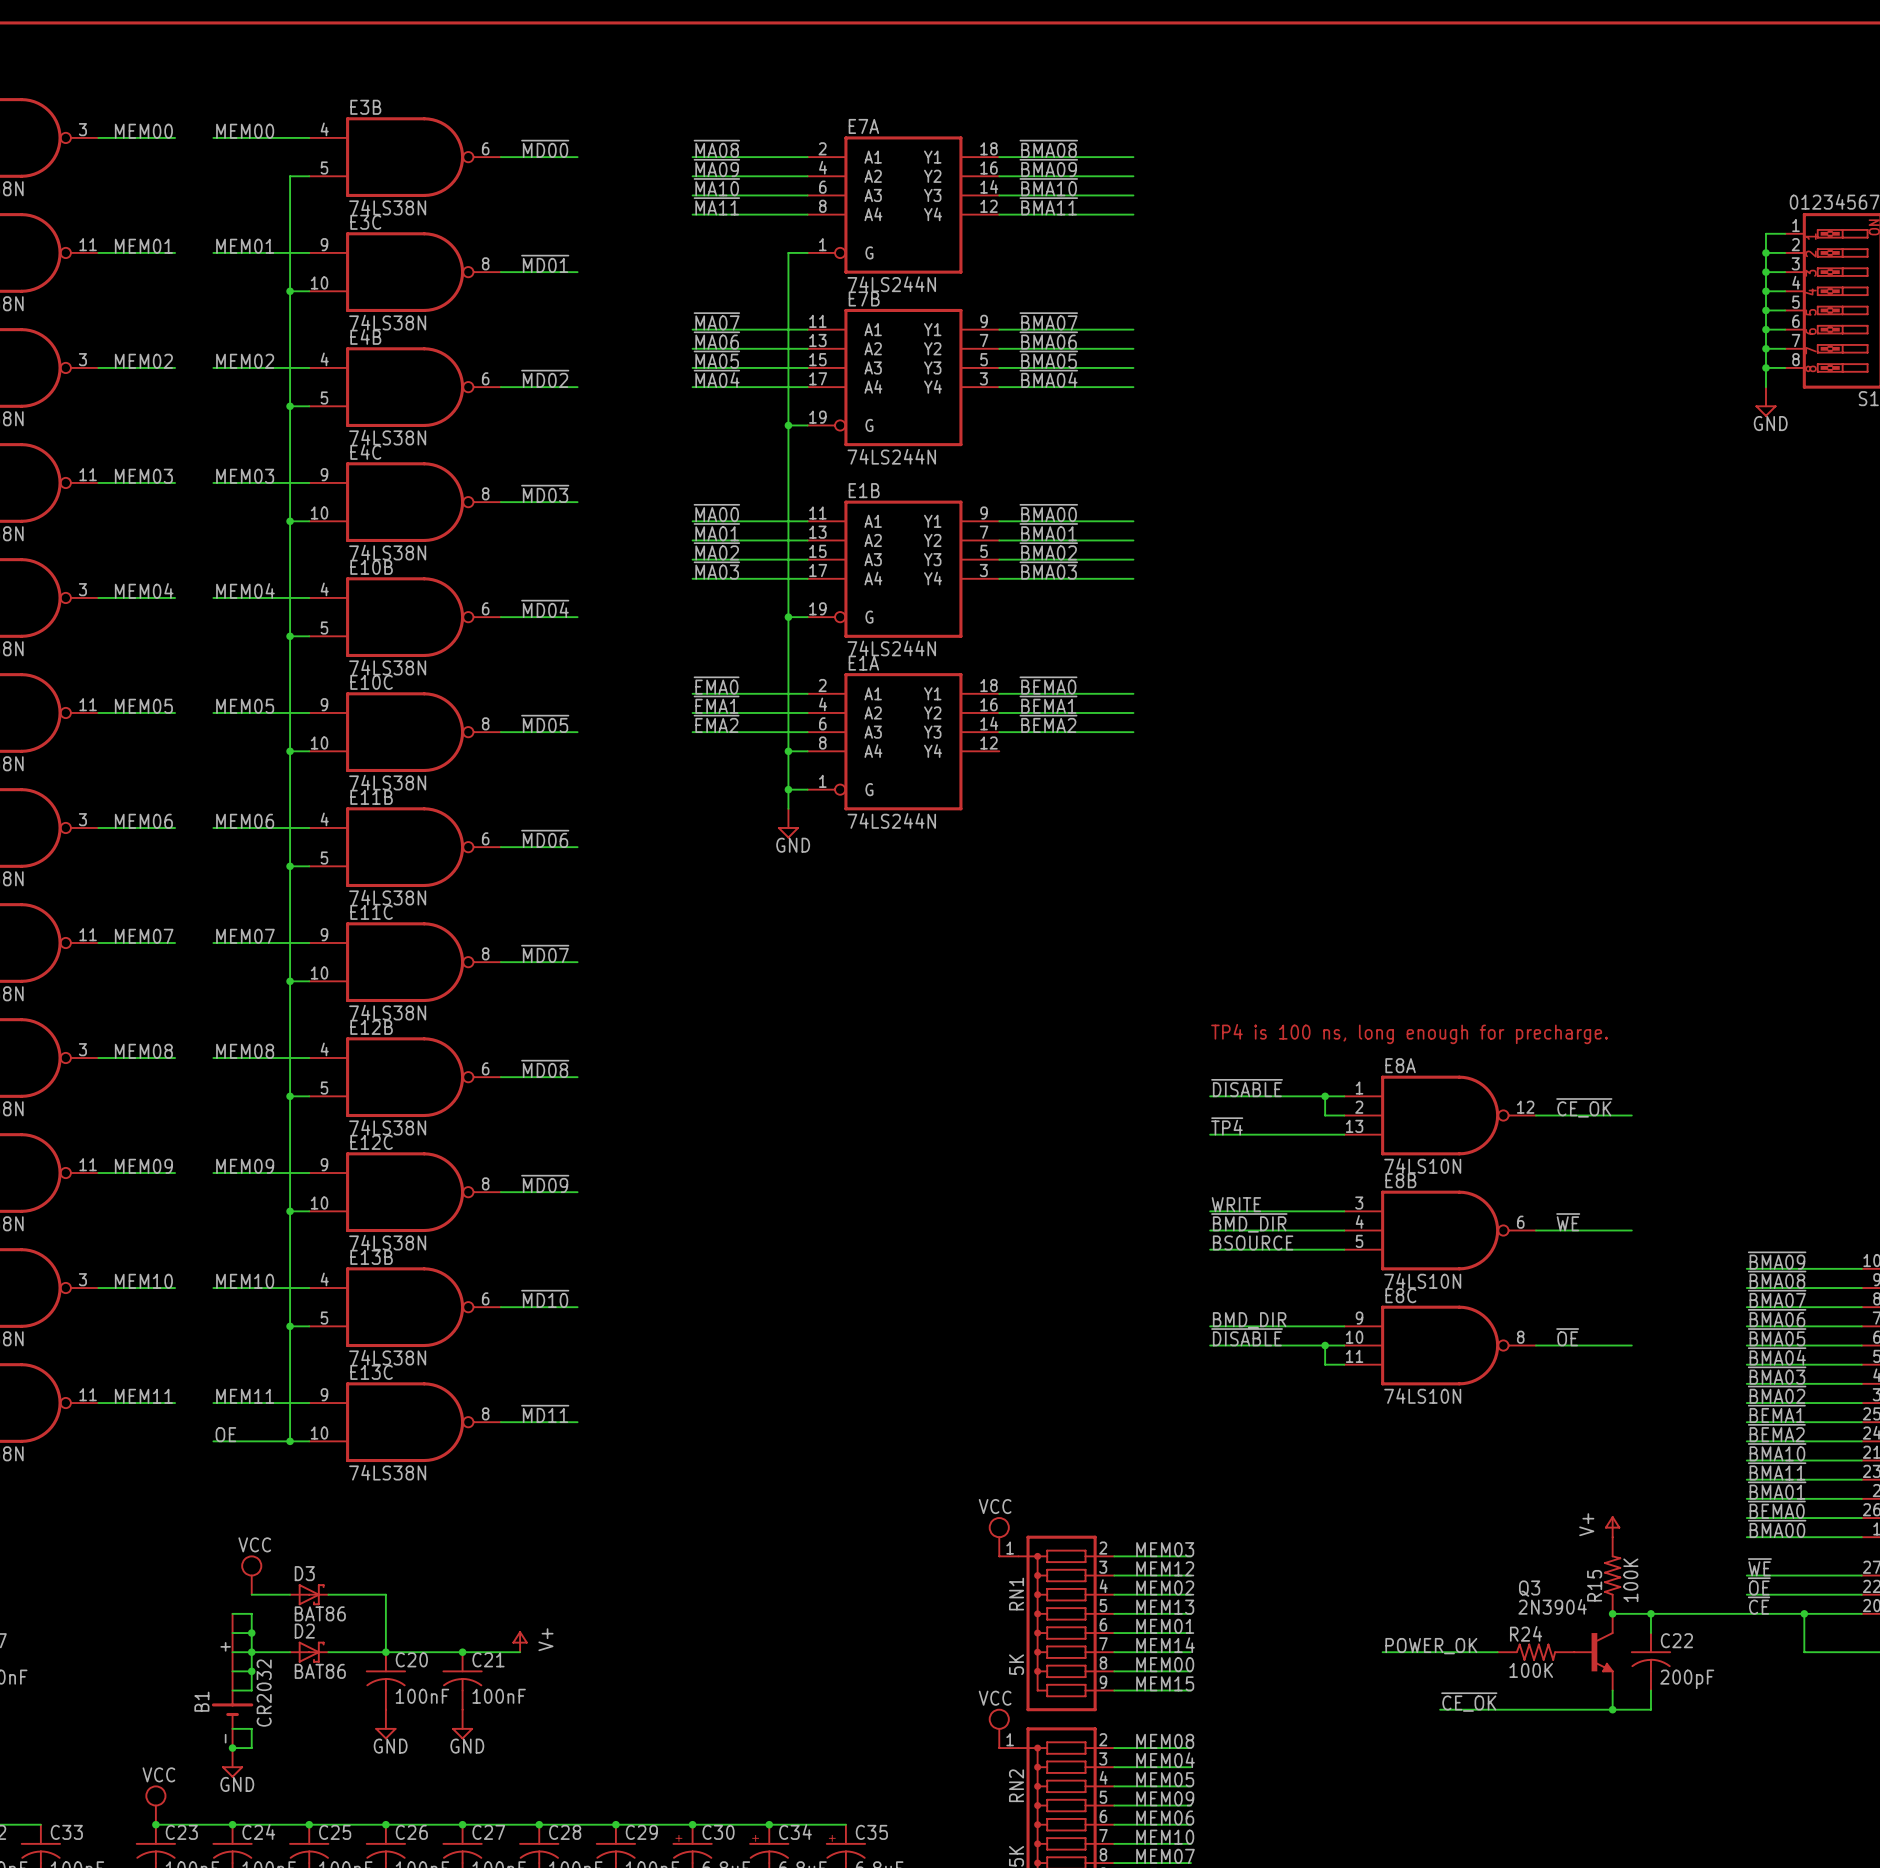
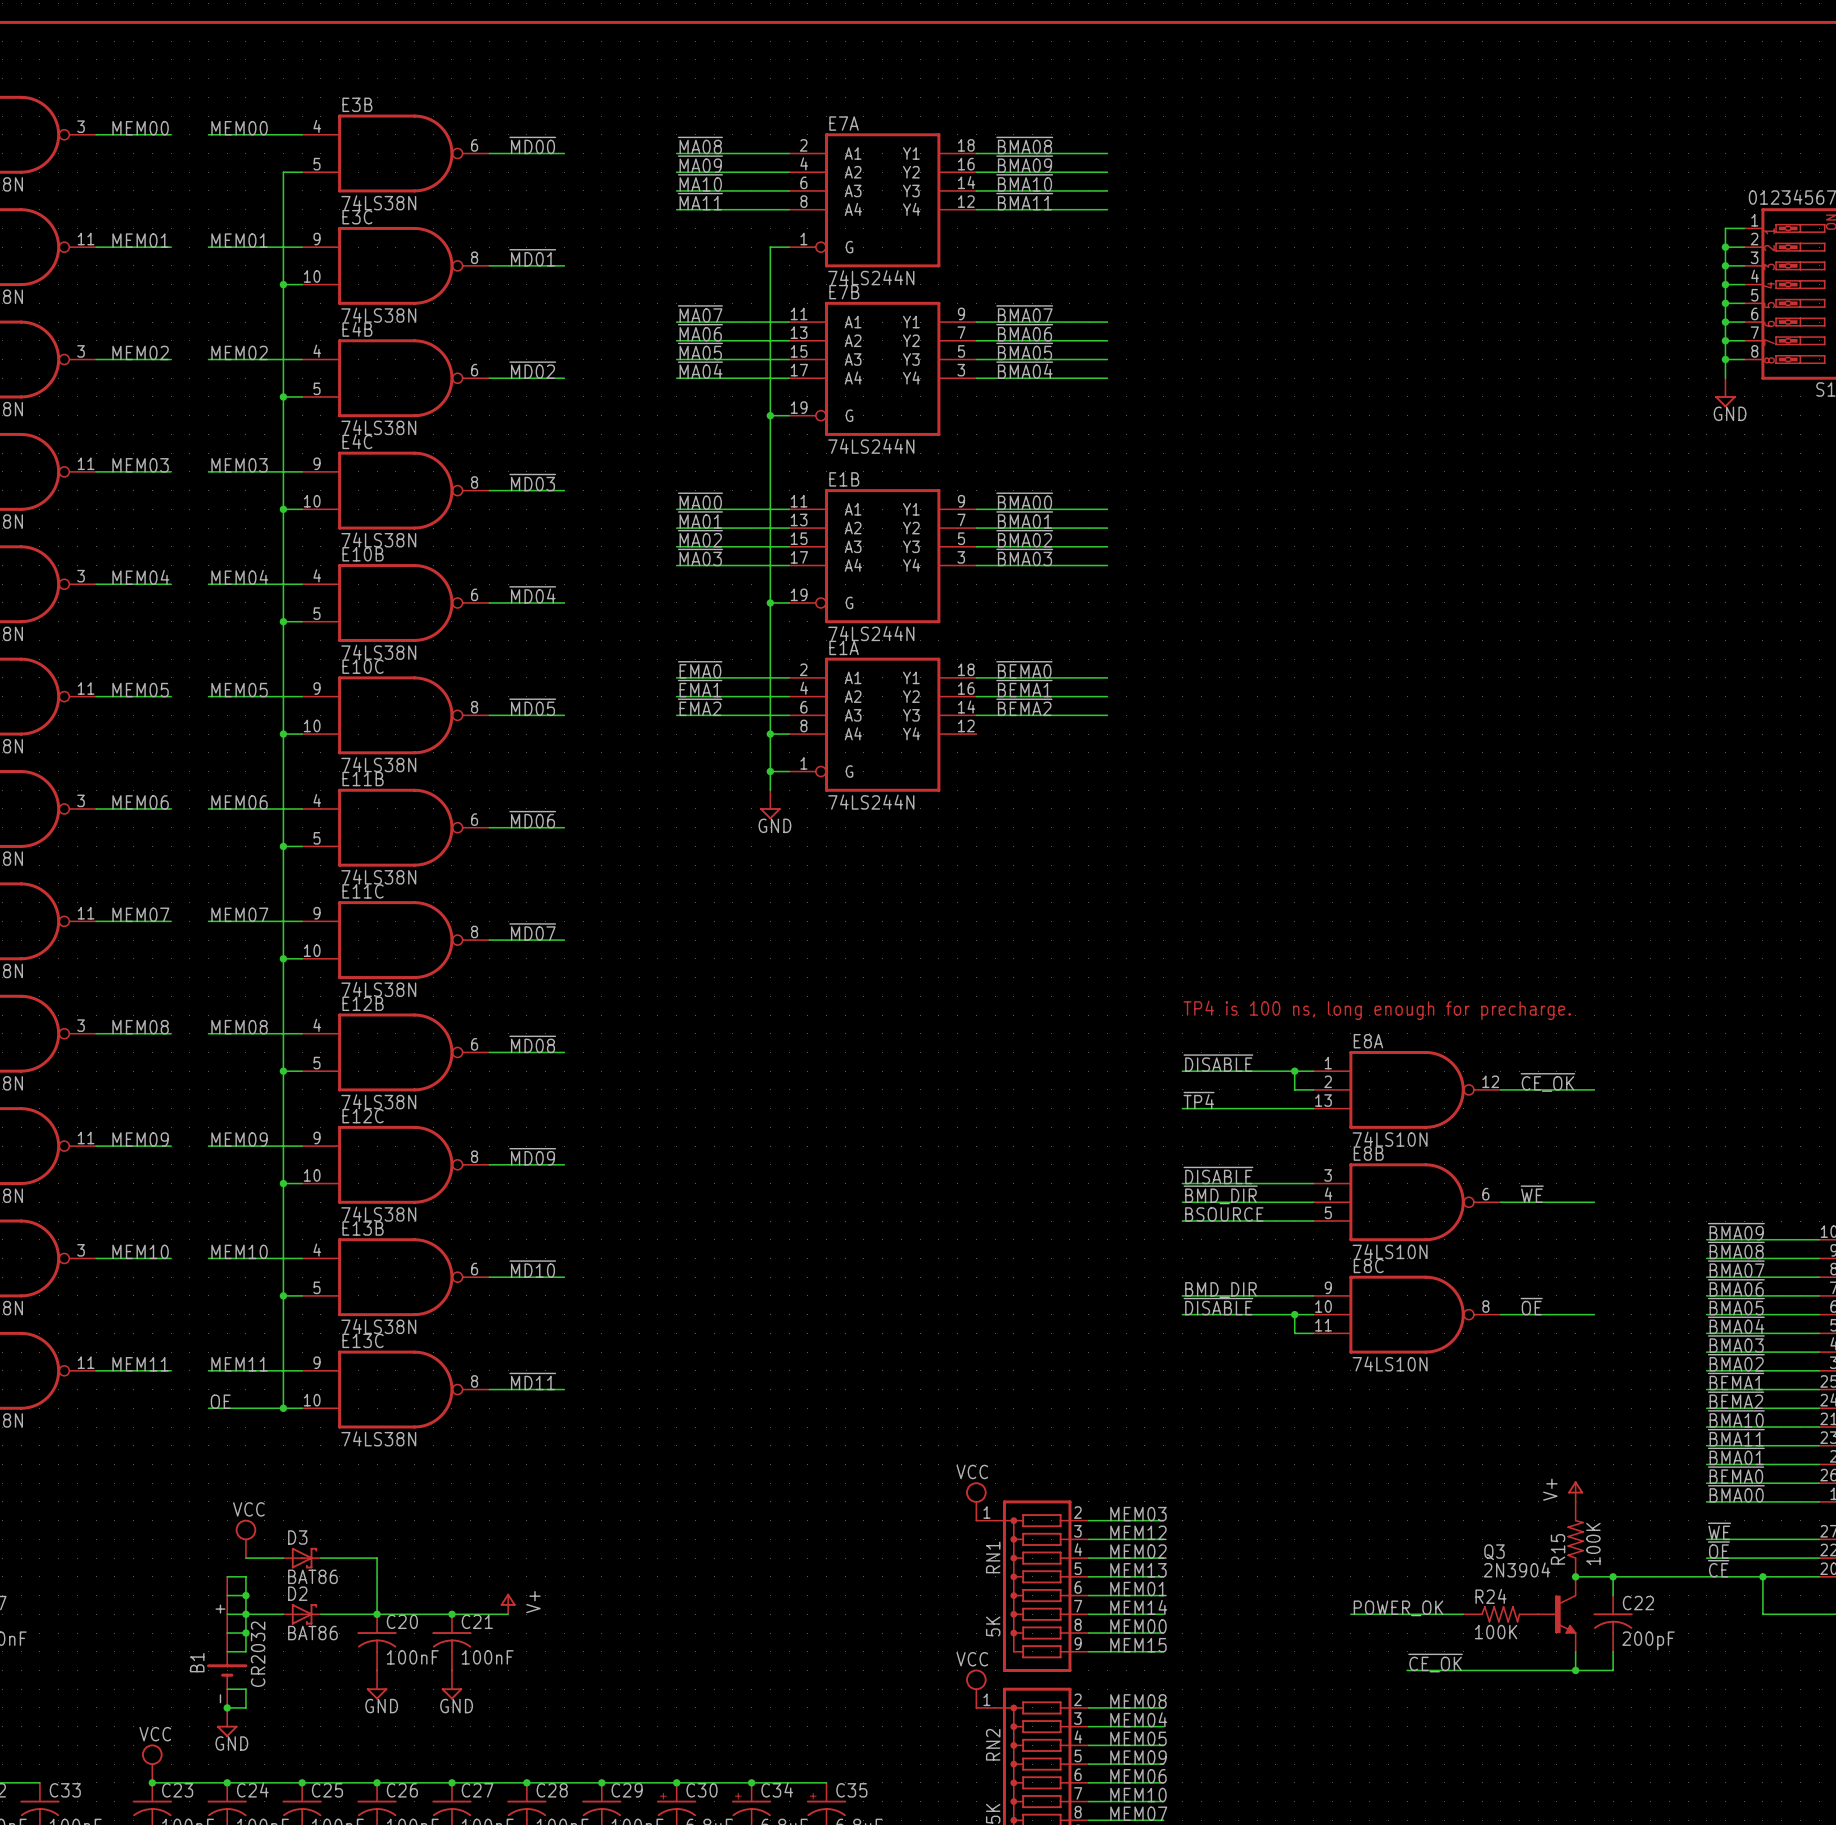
label: WRITE (1236, 1204) -> ~{DISABLE} (1218, 1175)

